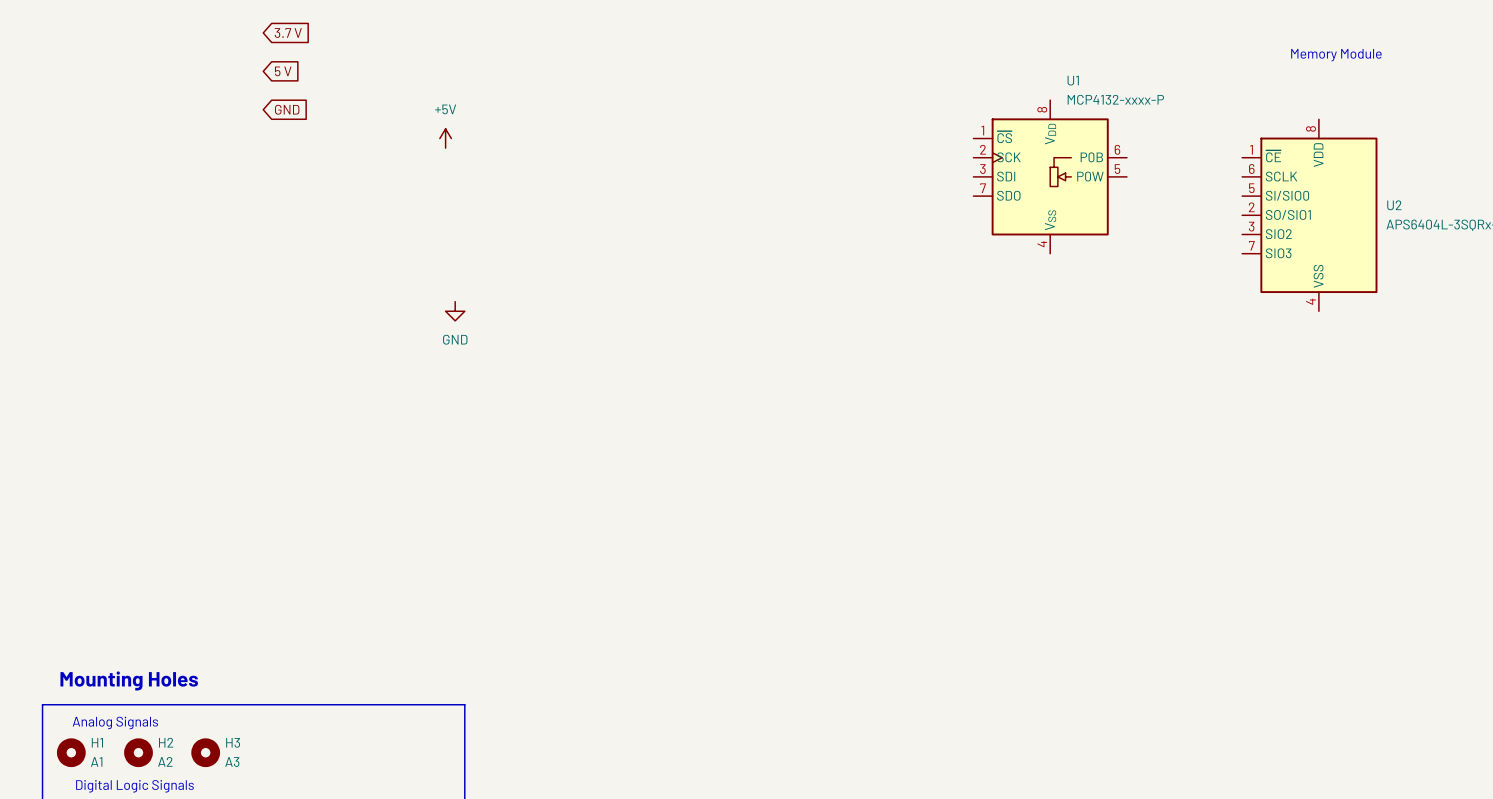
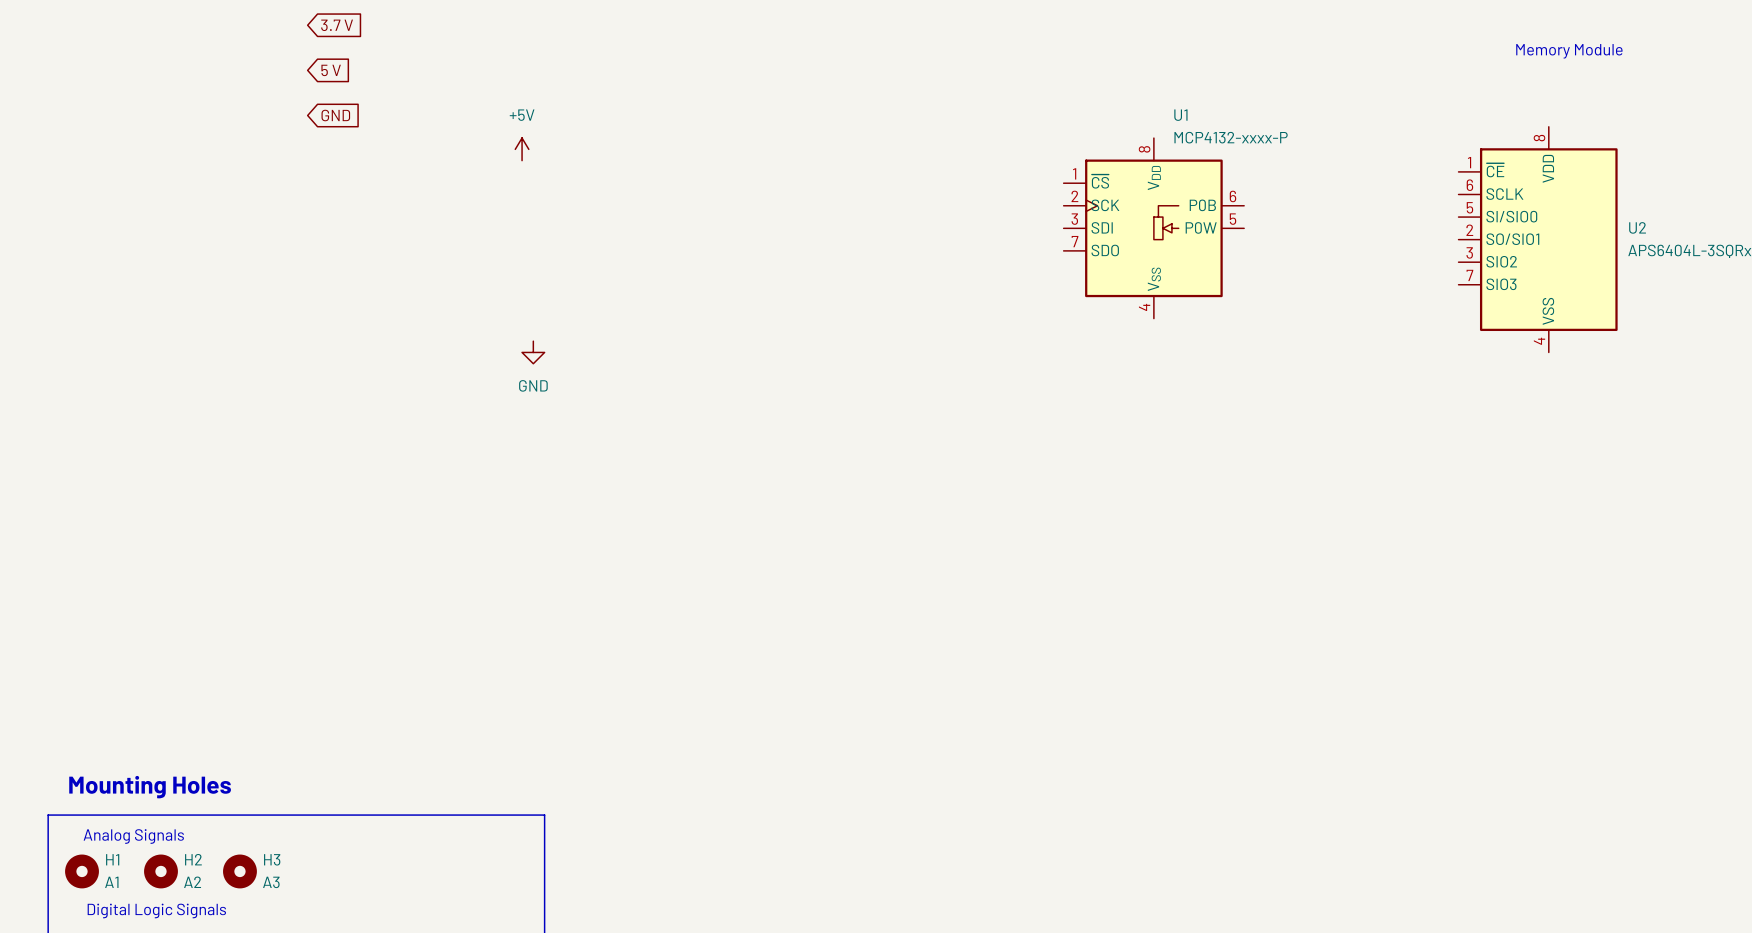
U1 position: (1050, 176) -> (1153, 228)

